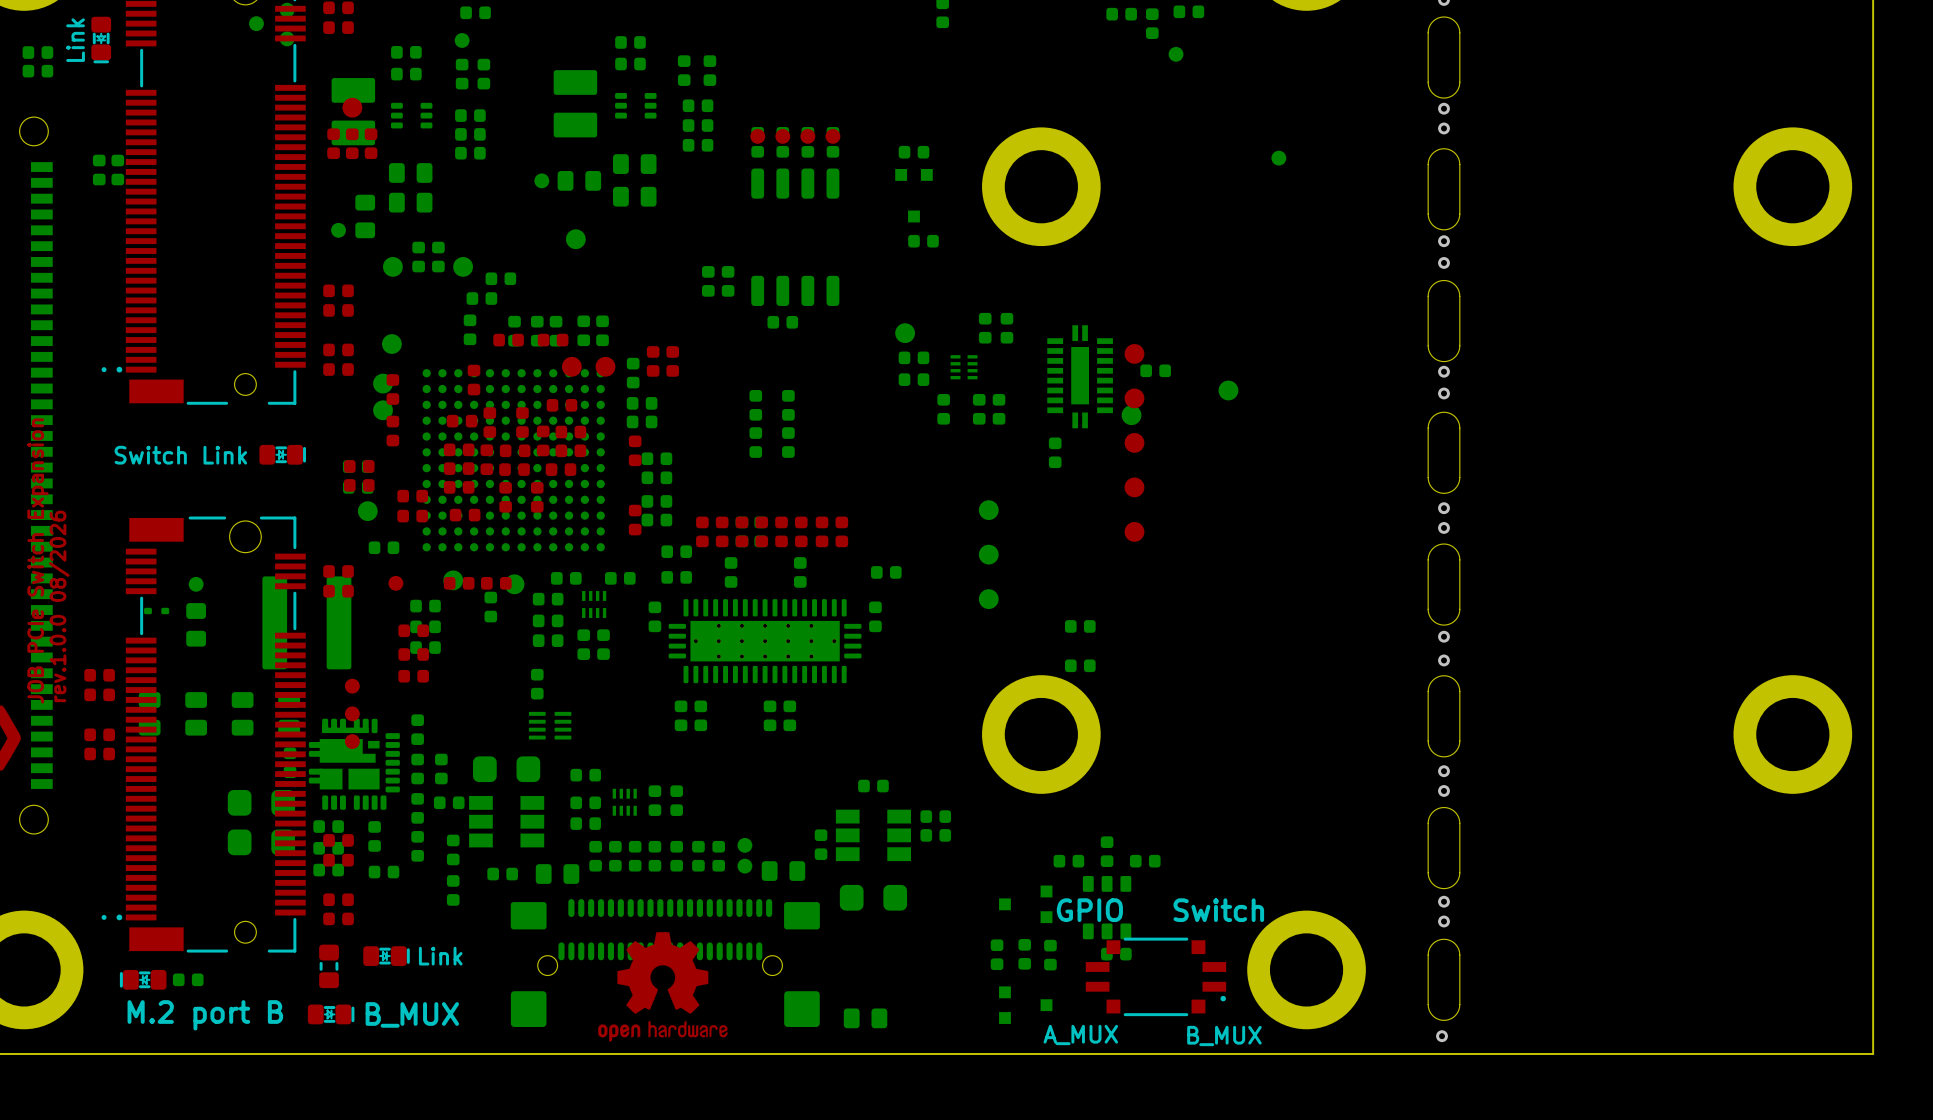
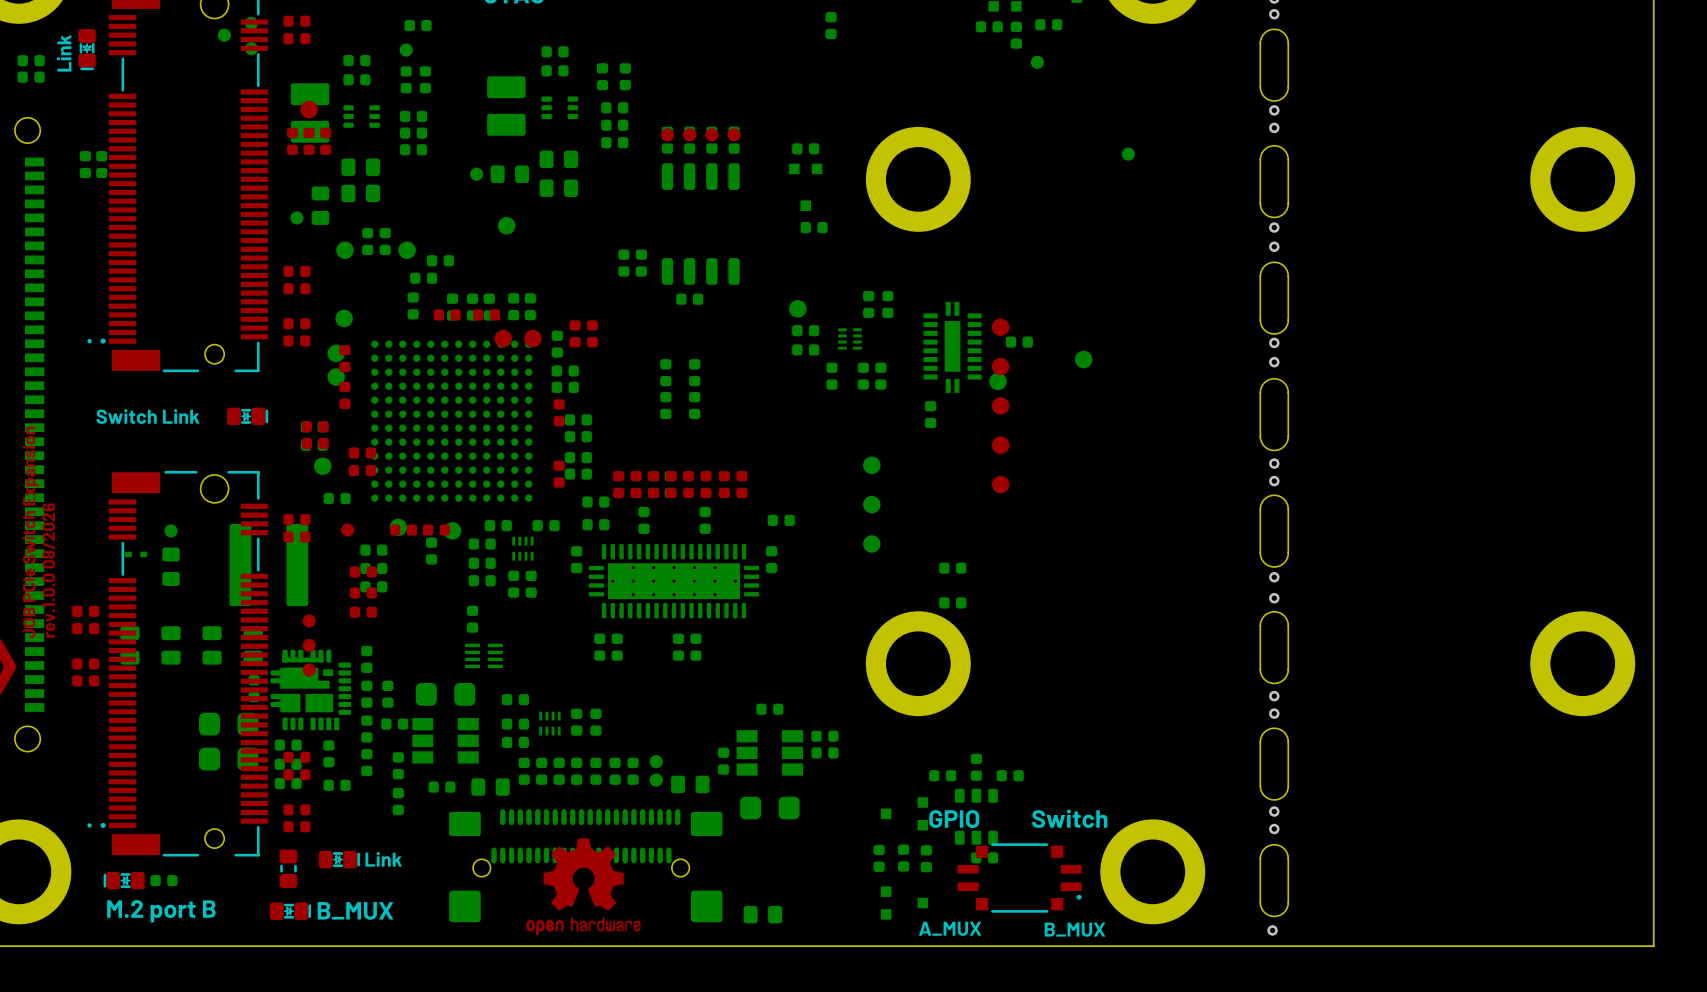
part: (473, 380) -> none
part: (561, 405) -> none
part: (462, 421) -> none
part: (489, 422) -> none
part: (522, 422) -> none
part: (570, 432) -> none
part: (543, 440) -> none
part: (459, 449) -> none
part: (515, 450) -> none
part: (570, 450) -> none
part: (486, 459) -> none
part: (459, 468) -> none
part: (514, 469) -> none
part: (561, 469) -> none
part: (459, 487) -> none
part: (505, 497) -> none
part: (537, 497) -> none
part: (465, 515) -> none

